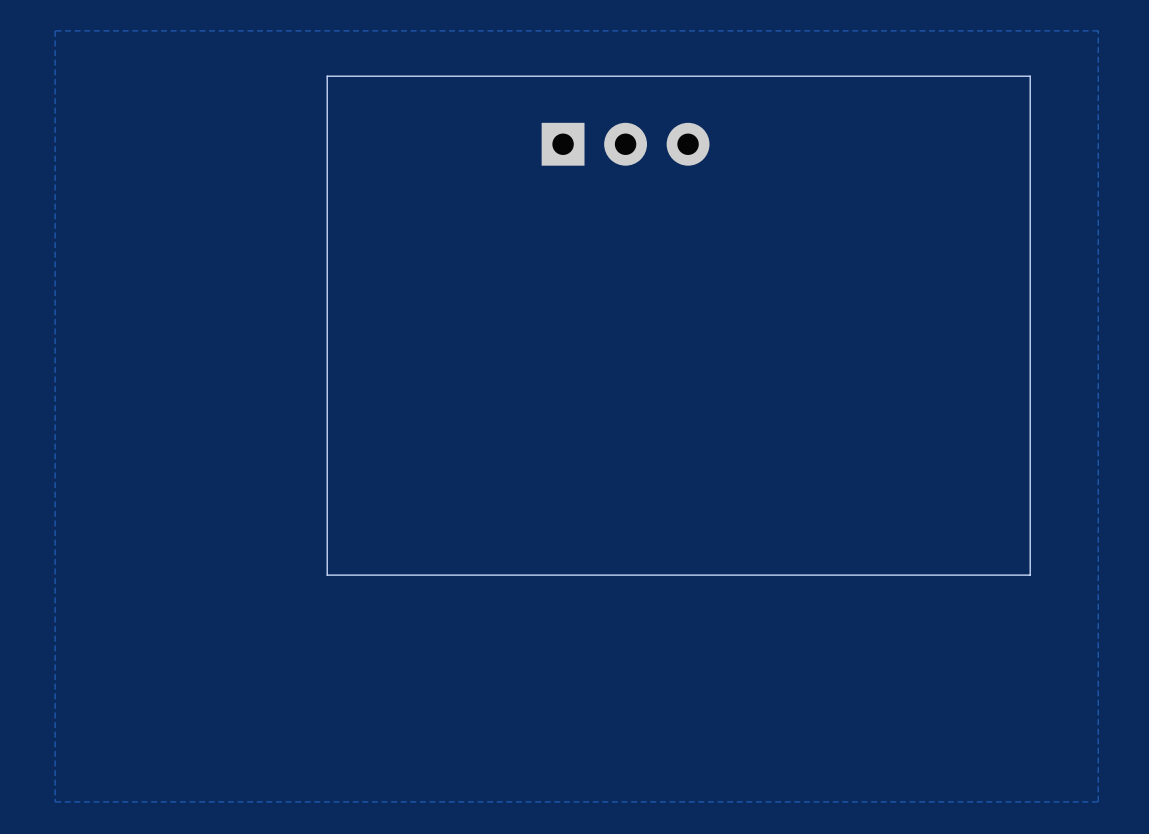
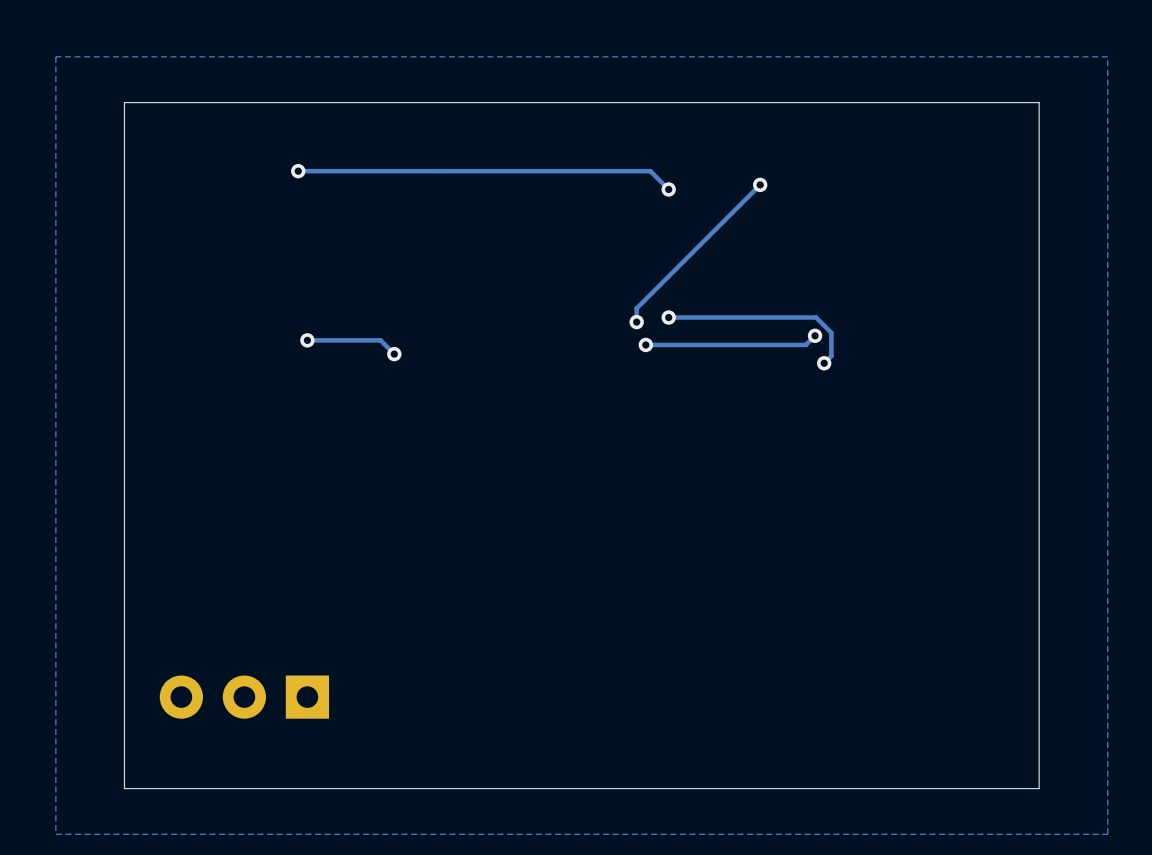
board edge: (327, 76) (327, 575) (1030, 575) -> (330, 102) (124, 102) (124, 788) (1039, 788) (1039, 605)
track: none -> (298, 171) (650, 171) (668, 189)
via: none -> (298, 171)
part: (625, 144) -> none
track: none -> (760, 184) (636, 308) (636, 322)
via: none -> (760, 184)
via: none -> (668, 189)
track: none -> (668, 317) (816, 317) (831, 332) (831, 356) (824, 363)
via: none -> (668, 317)
via: none -> (636, 322)
track: none -> (815, 335) (805, 344) (645, 344)
via: none -> (815, 335)
track: none -> (307, 340) (380, 340) (394, 354)
via: none -> (307, 340)
via: none -> (645, 344)
via: none -> (394, 354)
via: none -> (824, 363)
part: none -> (244, 697)

